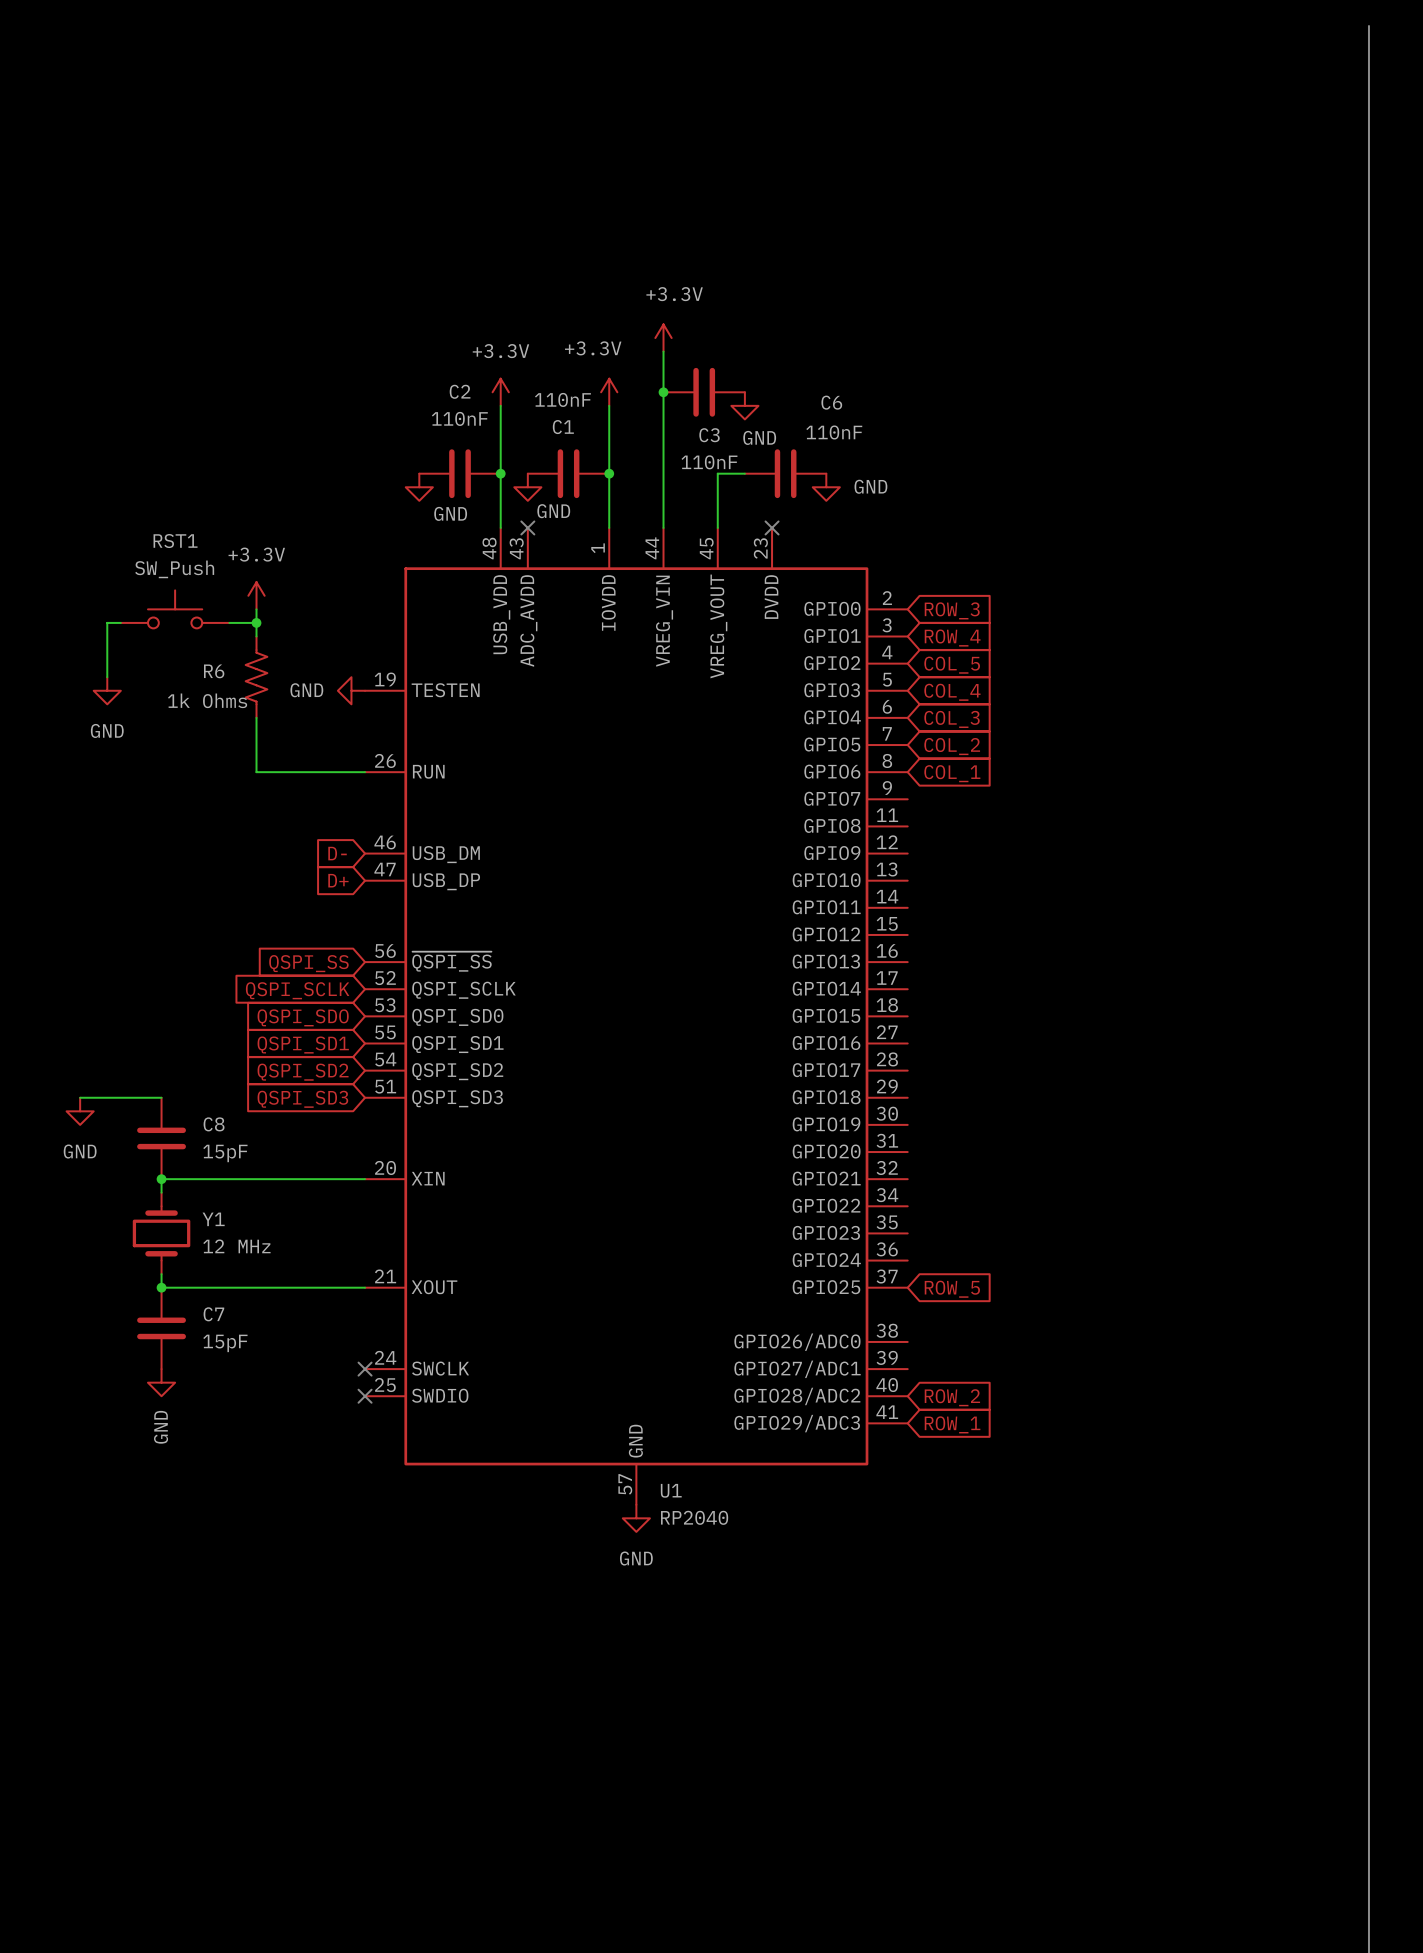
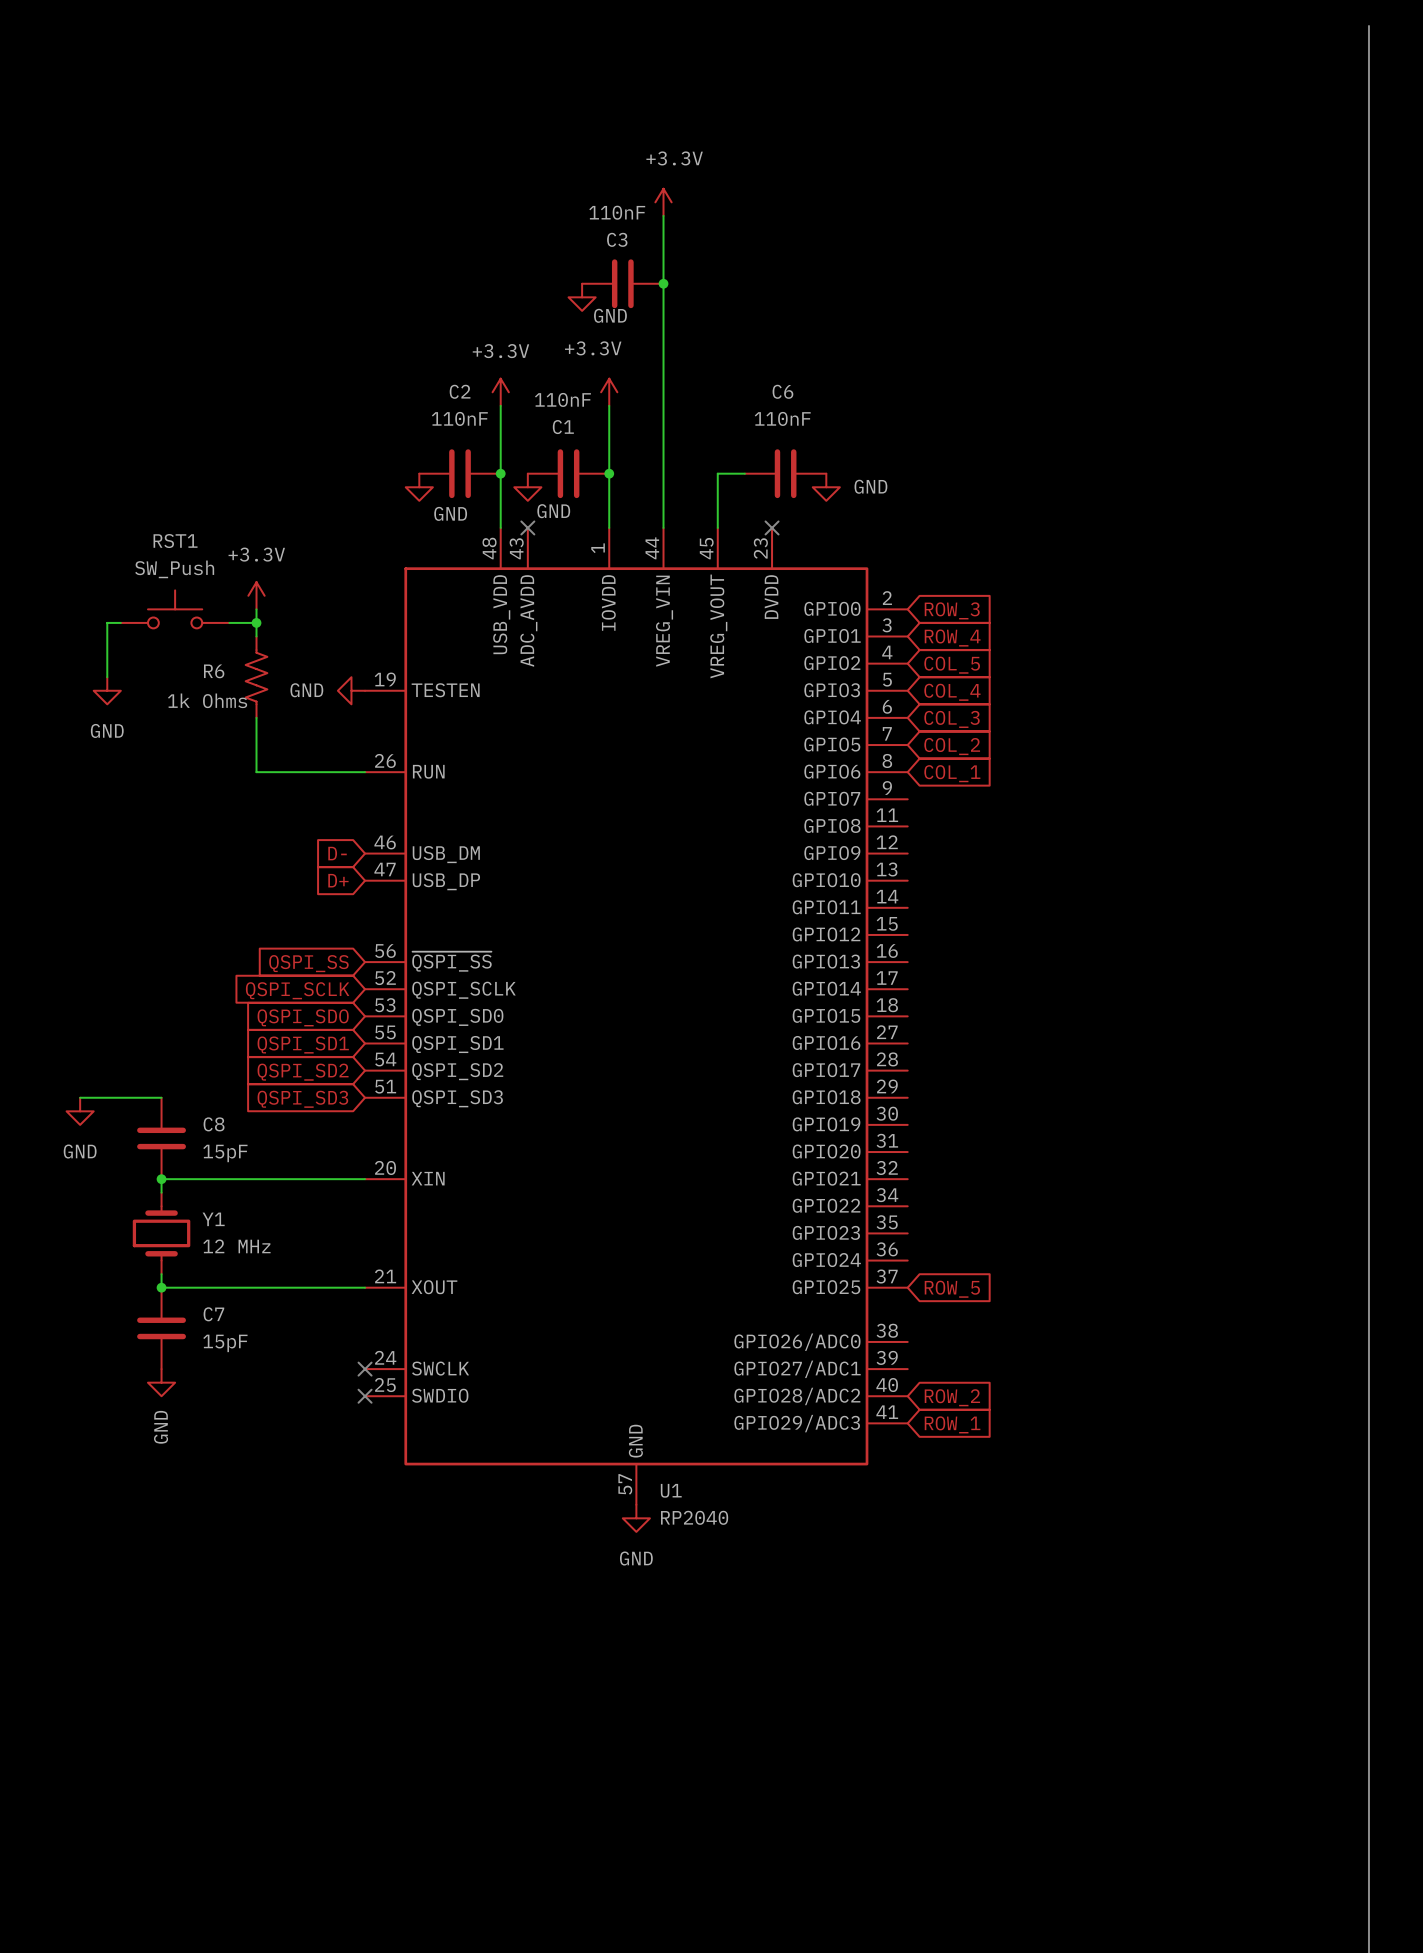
wire: none -> (663, 215) (663, 351)
junction: none -> (663, 283)
power symbol position: +3.3V (663, 338) -> +3.3V (663, 202)
junction: (663, 392) -> none
C3 position: (704, 392) -> (622, 283)
C6 name position: C6 (831, 402) -> C6 (782, 391)
power symbol position: GND (744, 405) -> GND (582, 297)
C6 value position: 110nF (834, 432) -> 110nF (782, 418)
C3 name position: C3 (709, 435) -> C3 (617, 239)
power symbol text position: GND (759, 437) -> GND (610, 315)
C3 value position: 110nF (709, 462) -> 110nF (617, 212)

